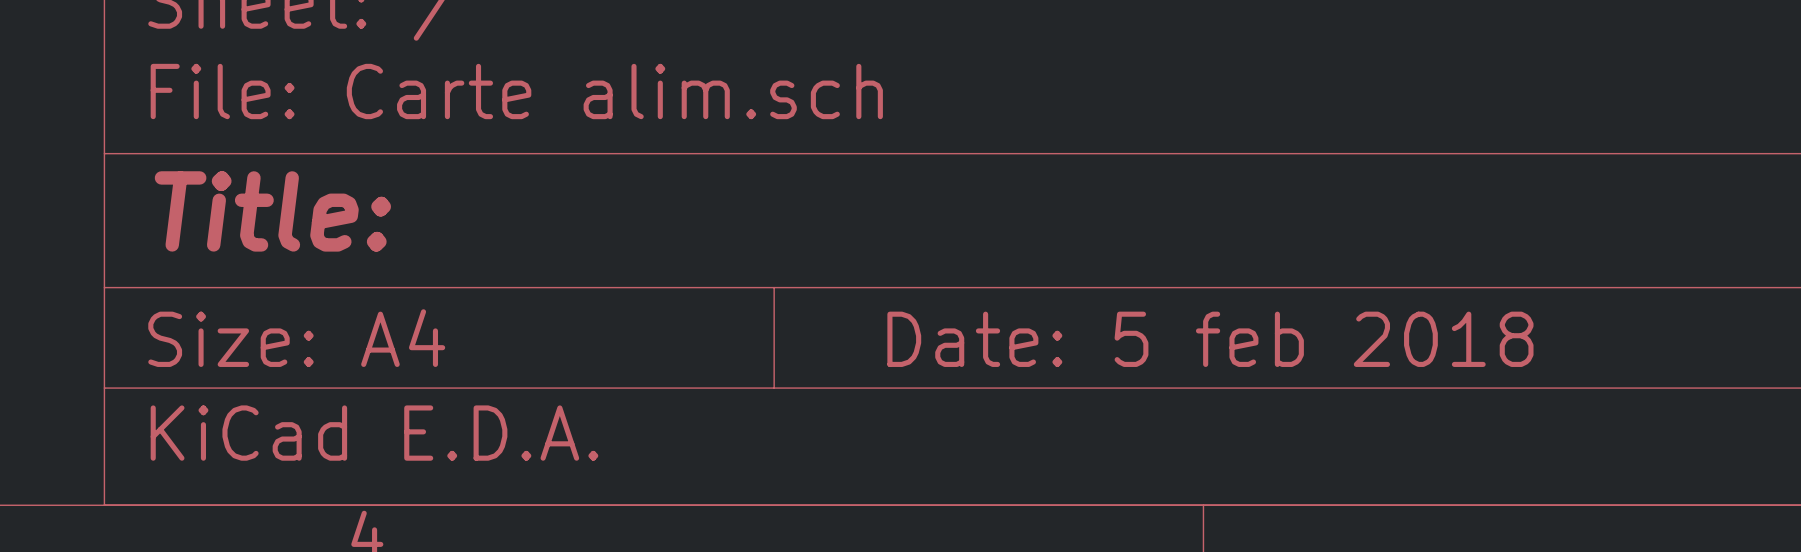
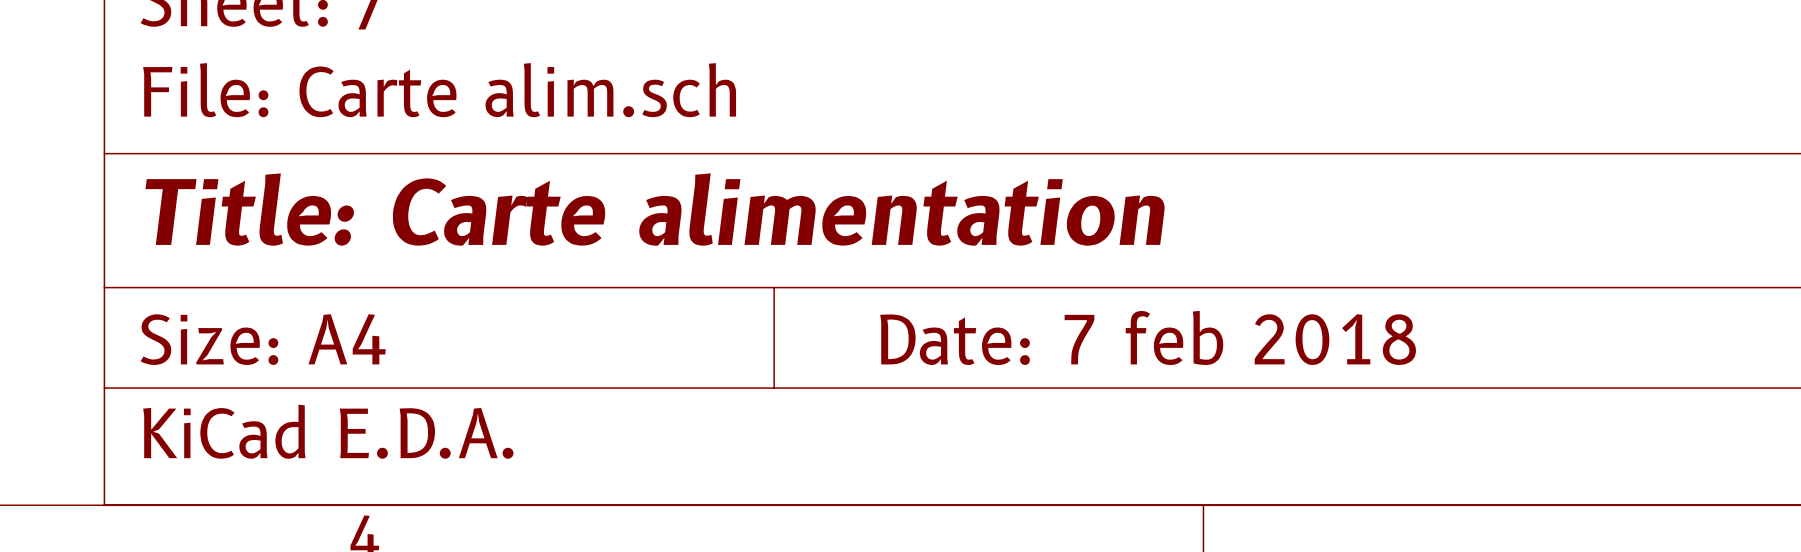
title block: Title: (272, 211) -> Title: Carte alimentation (655, 209)
title block: Date: 5 feb 2018 (1210, 339) -> Date: 7 feb 2018 (1148, 337)

